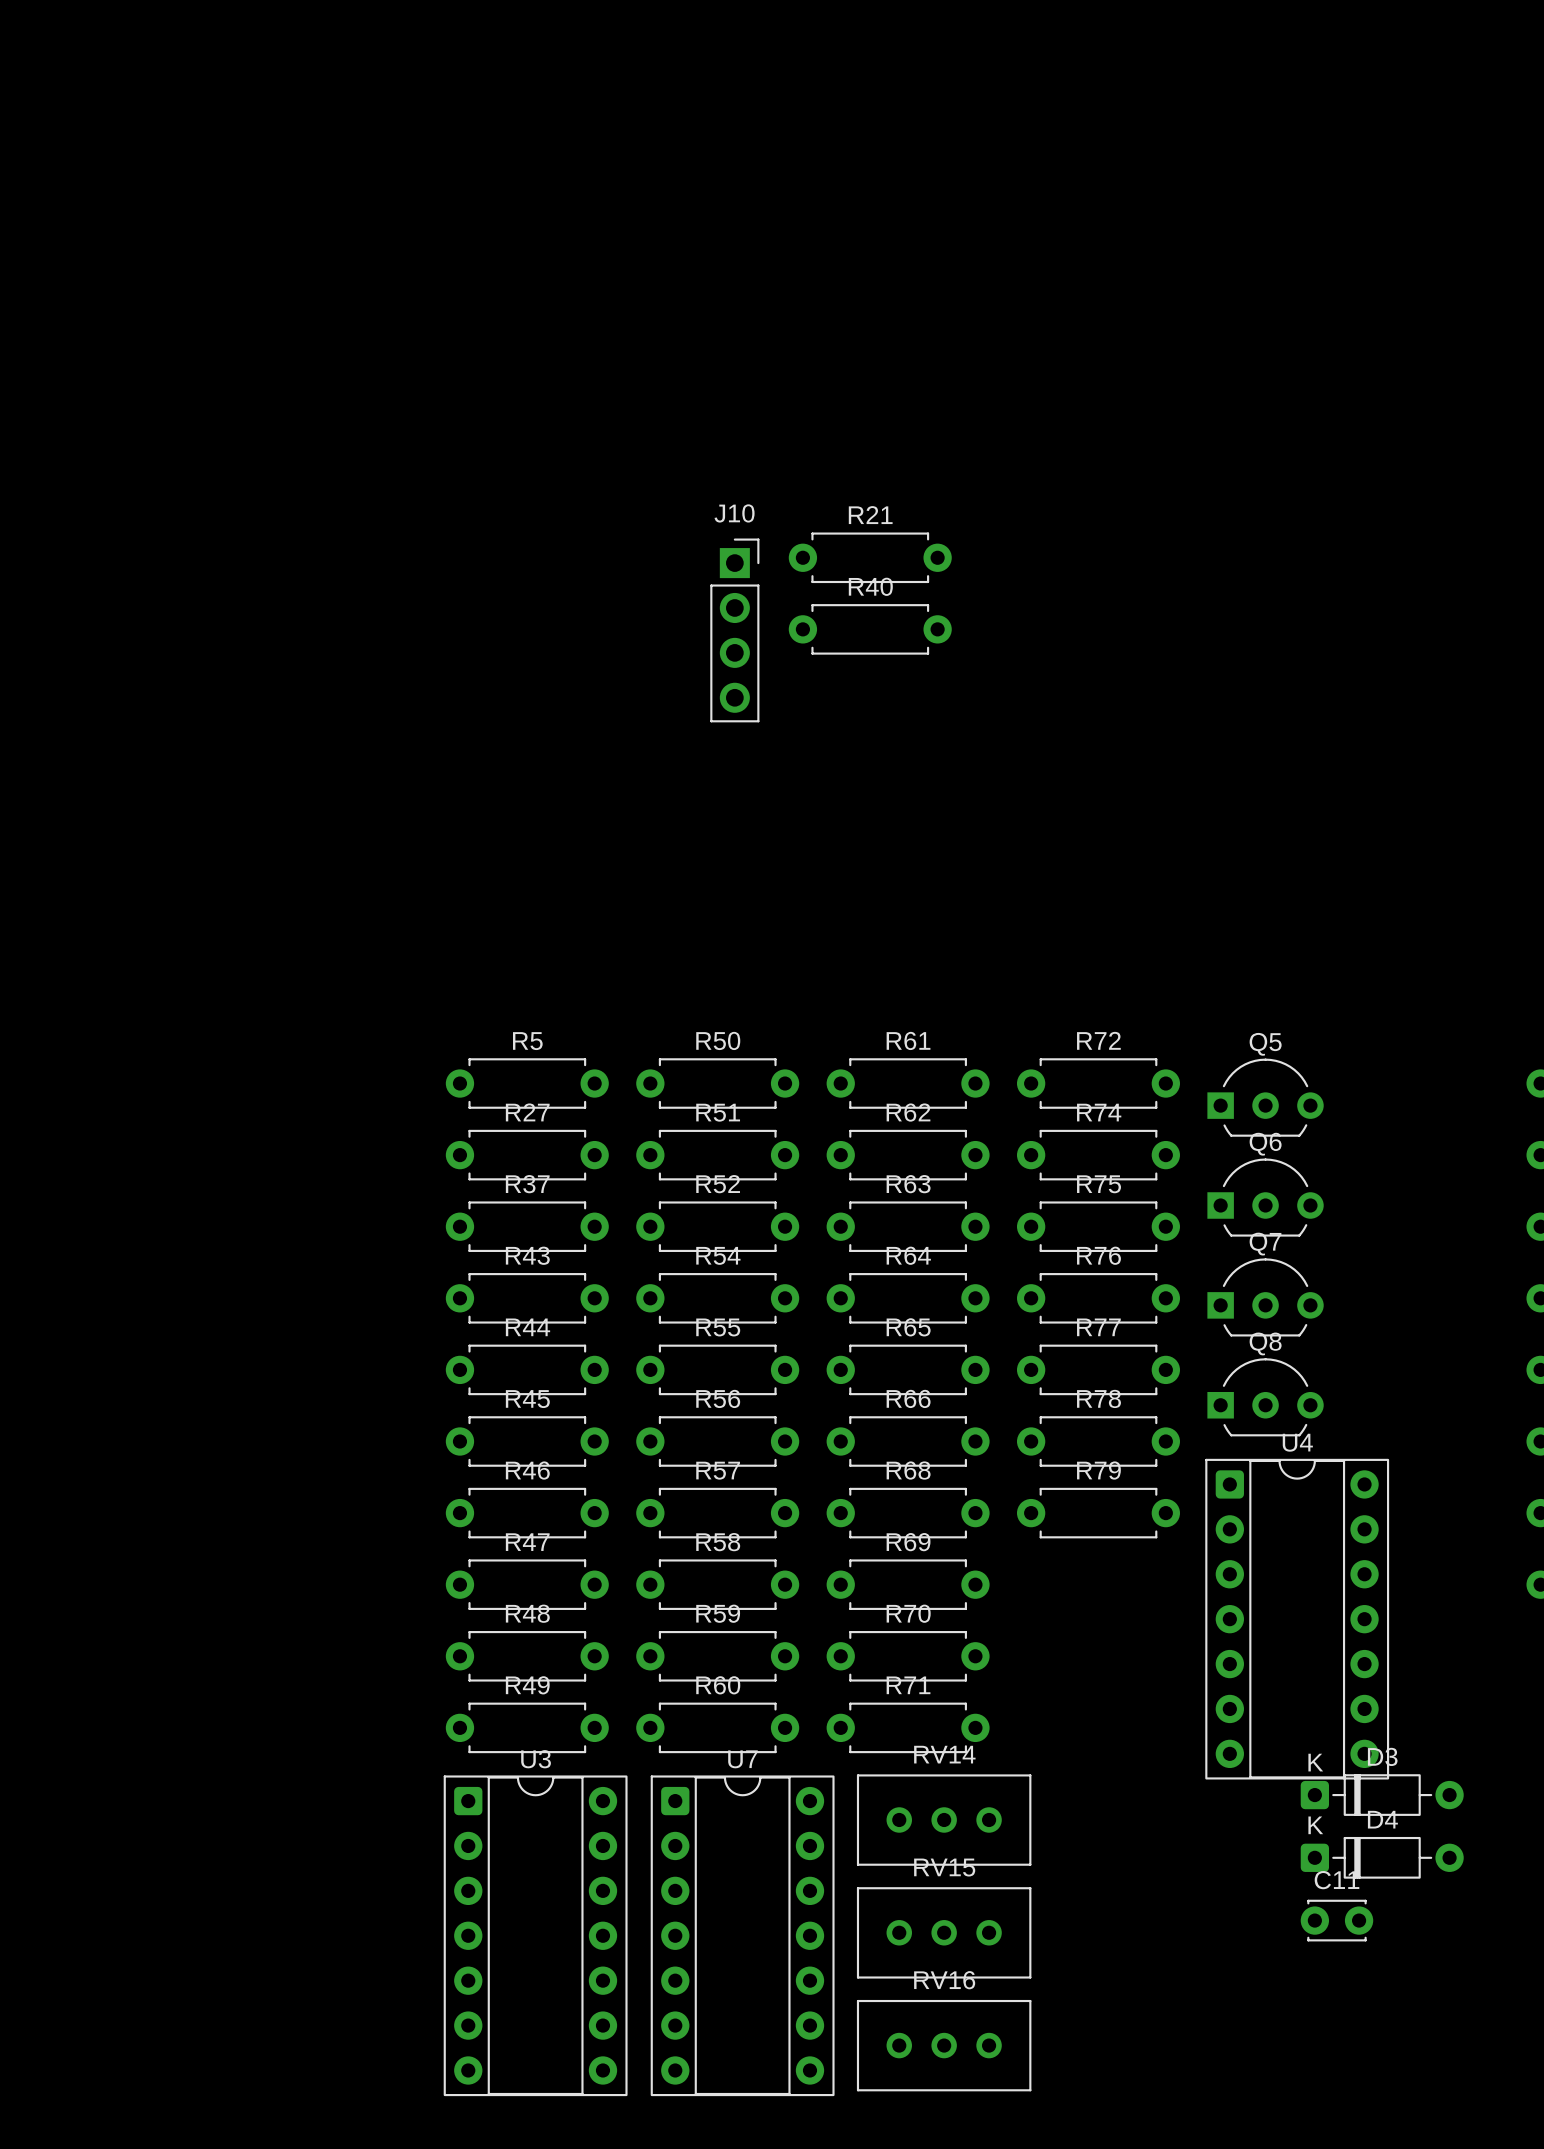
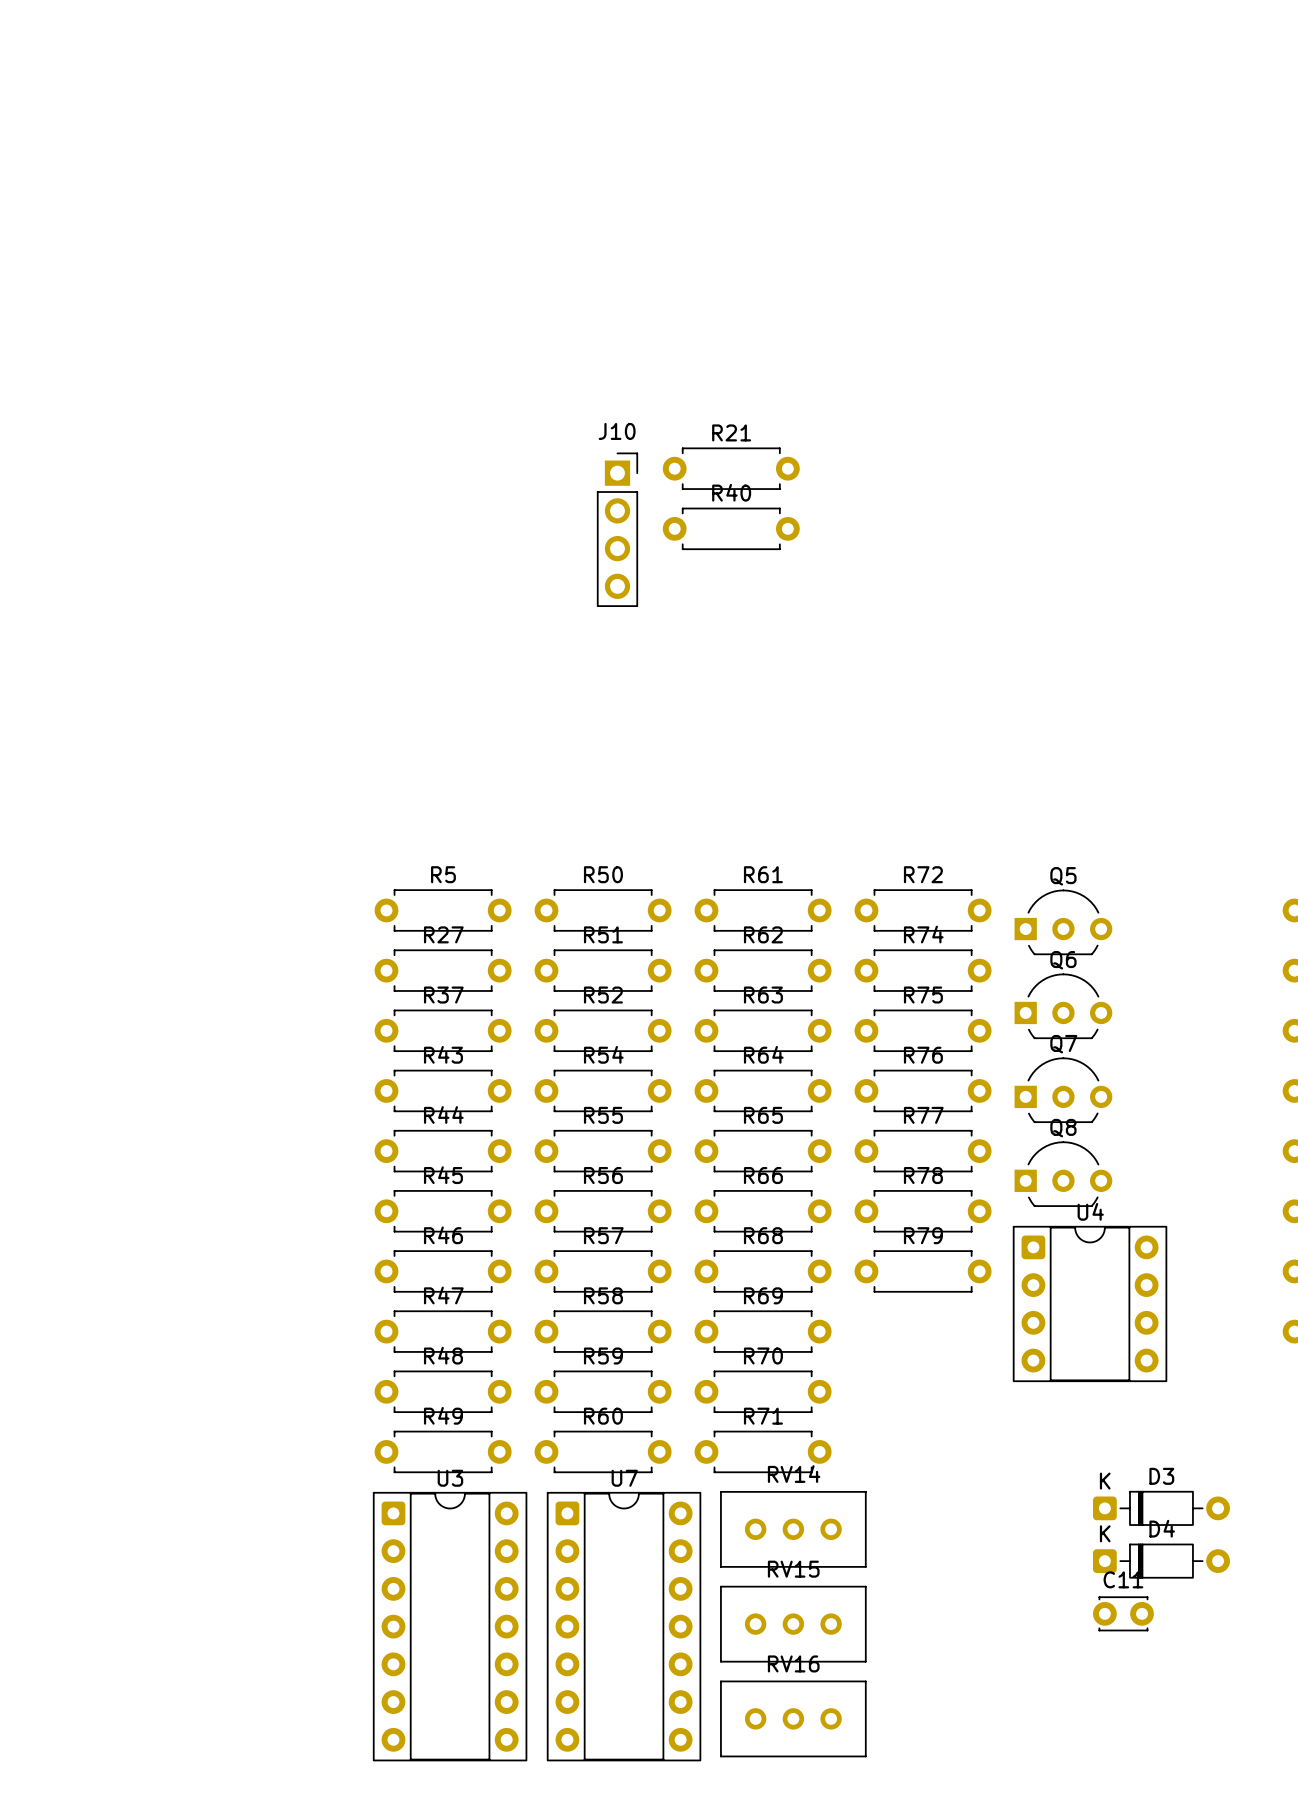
U4 footprint: [1205, 1458, 1390, 1780] -> [1012, 1225, 1168, 1383]

